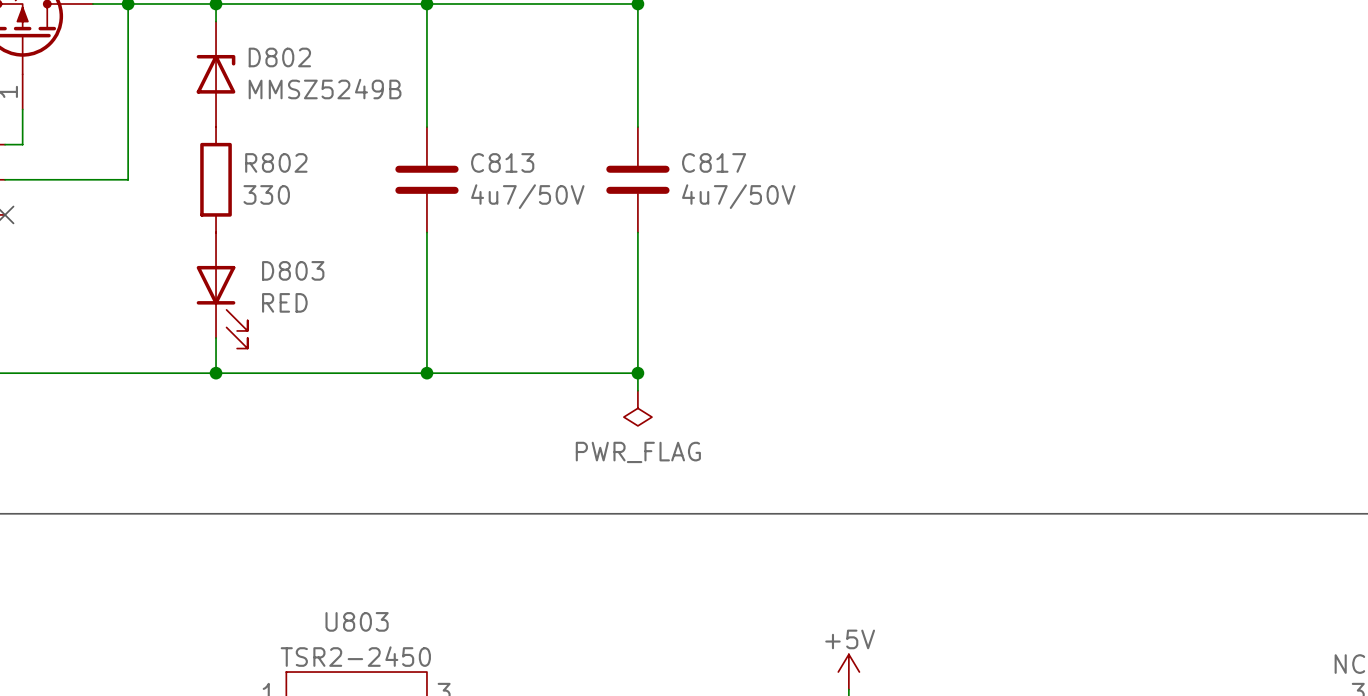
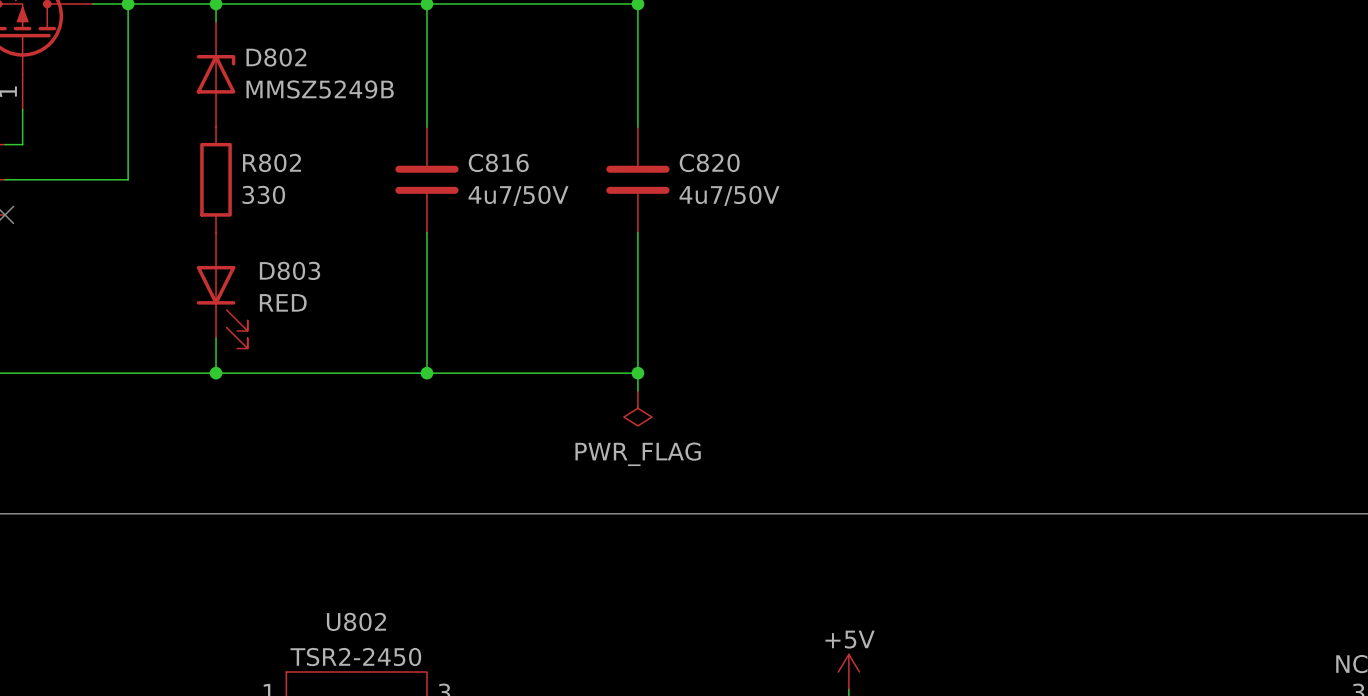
C813 name: C813 (502, 162) -> C816 (498, 162)
C817 name: C817 (714, 162) -> C820 (709, 162)
U803 name: U803 (357, 621) -> U802 (356, 621)

